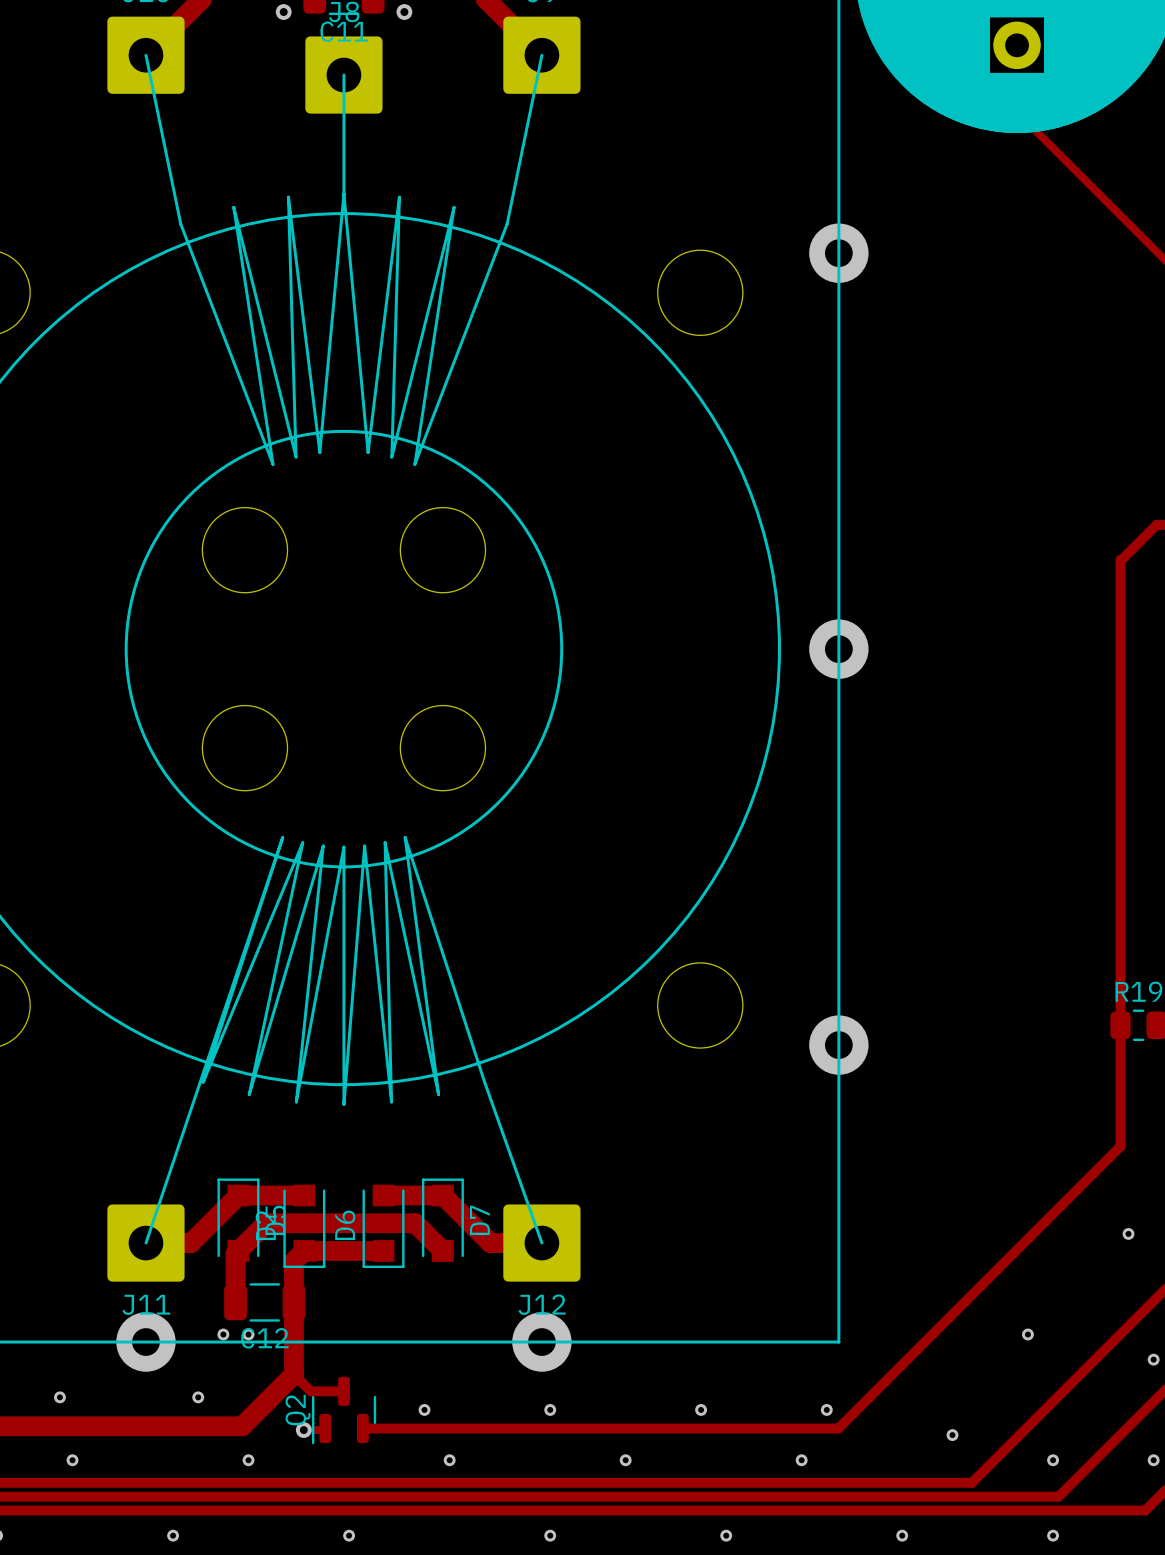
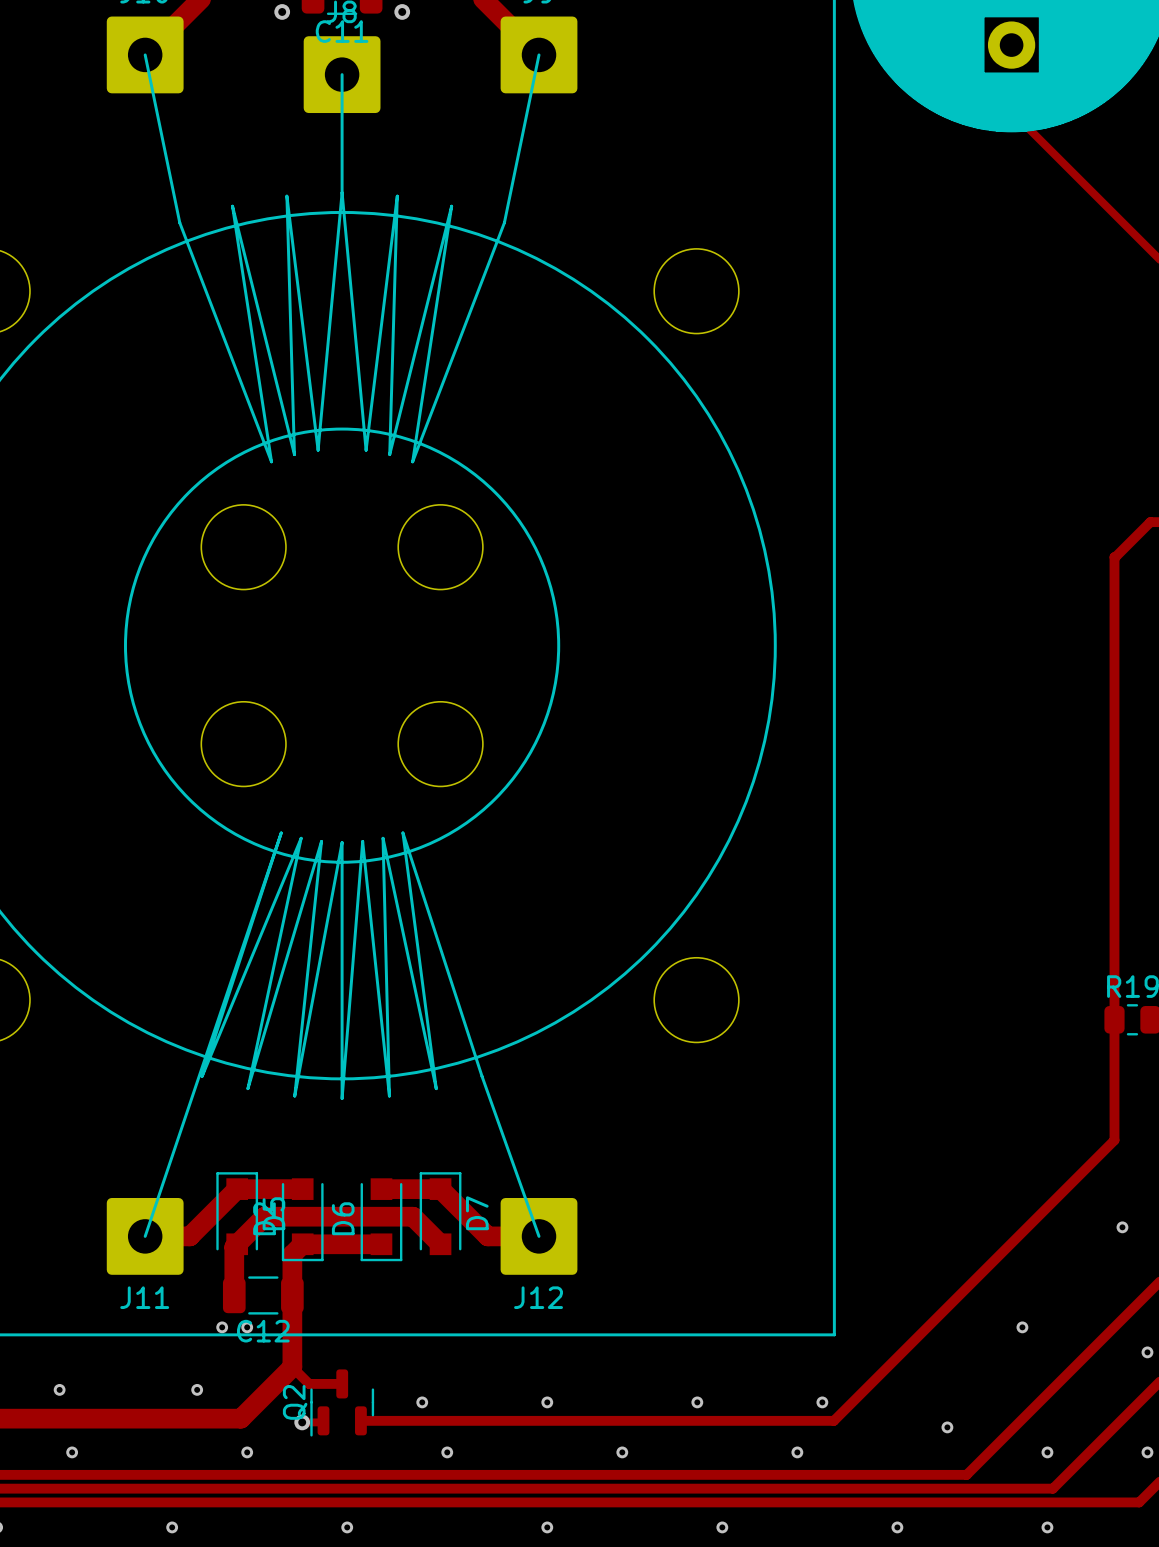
via: (838, 253) -> none
via: (838, 649) -> none
via: (838, 1045) -> none
via: (145, 1342) -> none
via: (541, 1342) -> none

